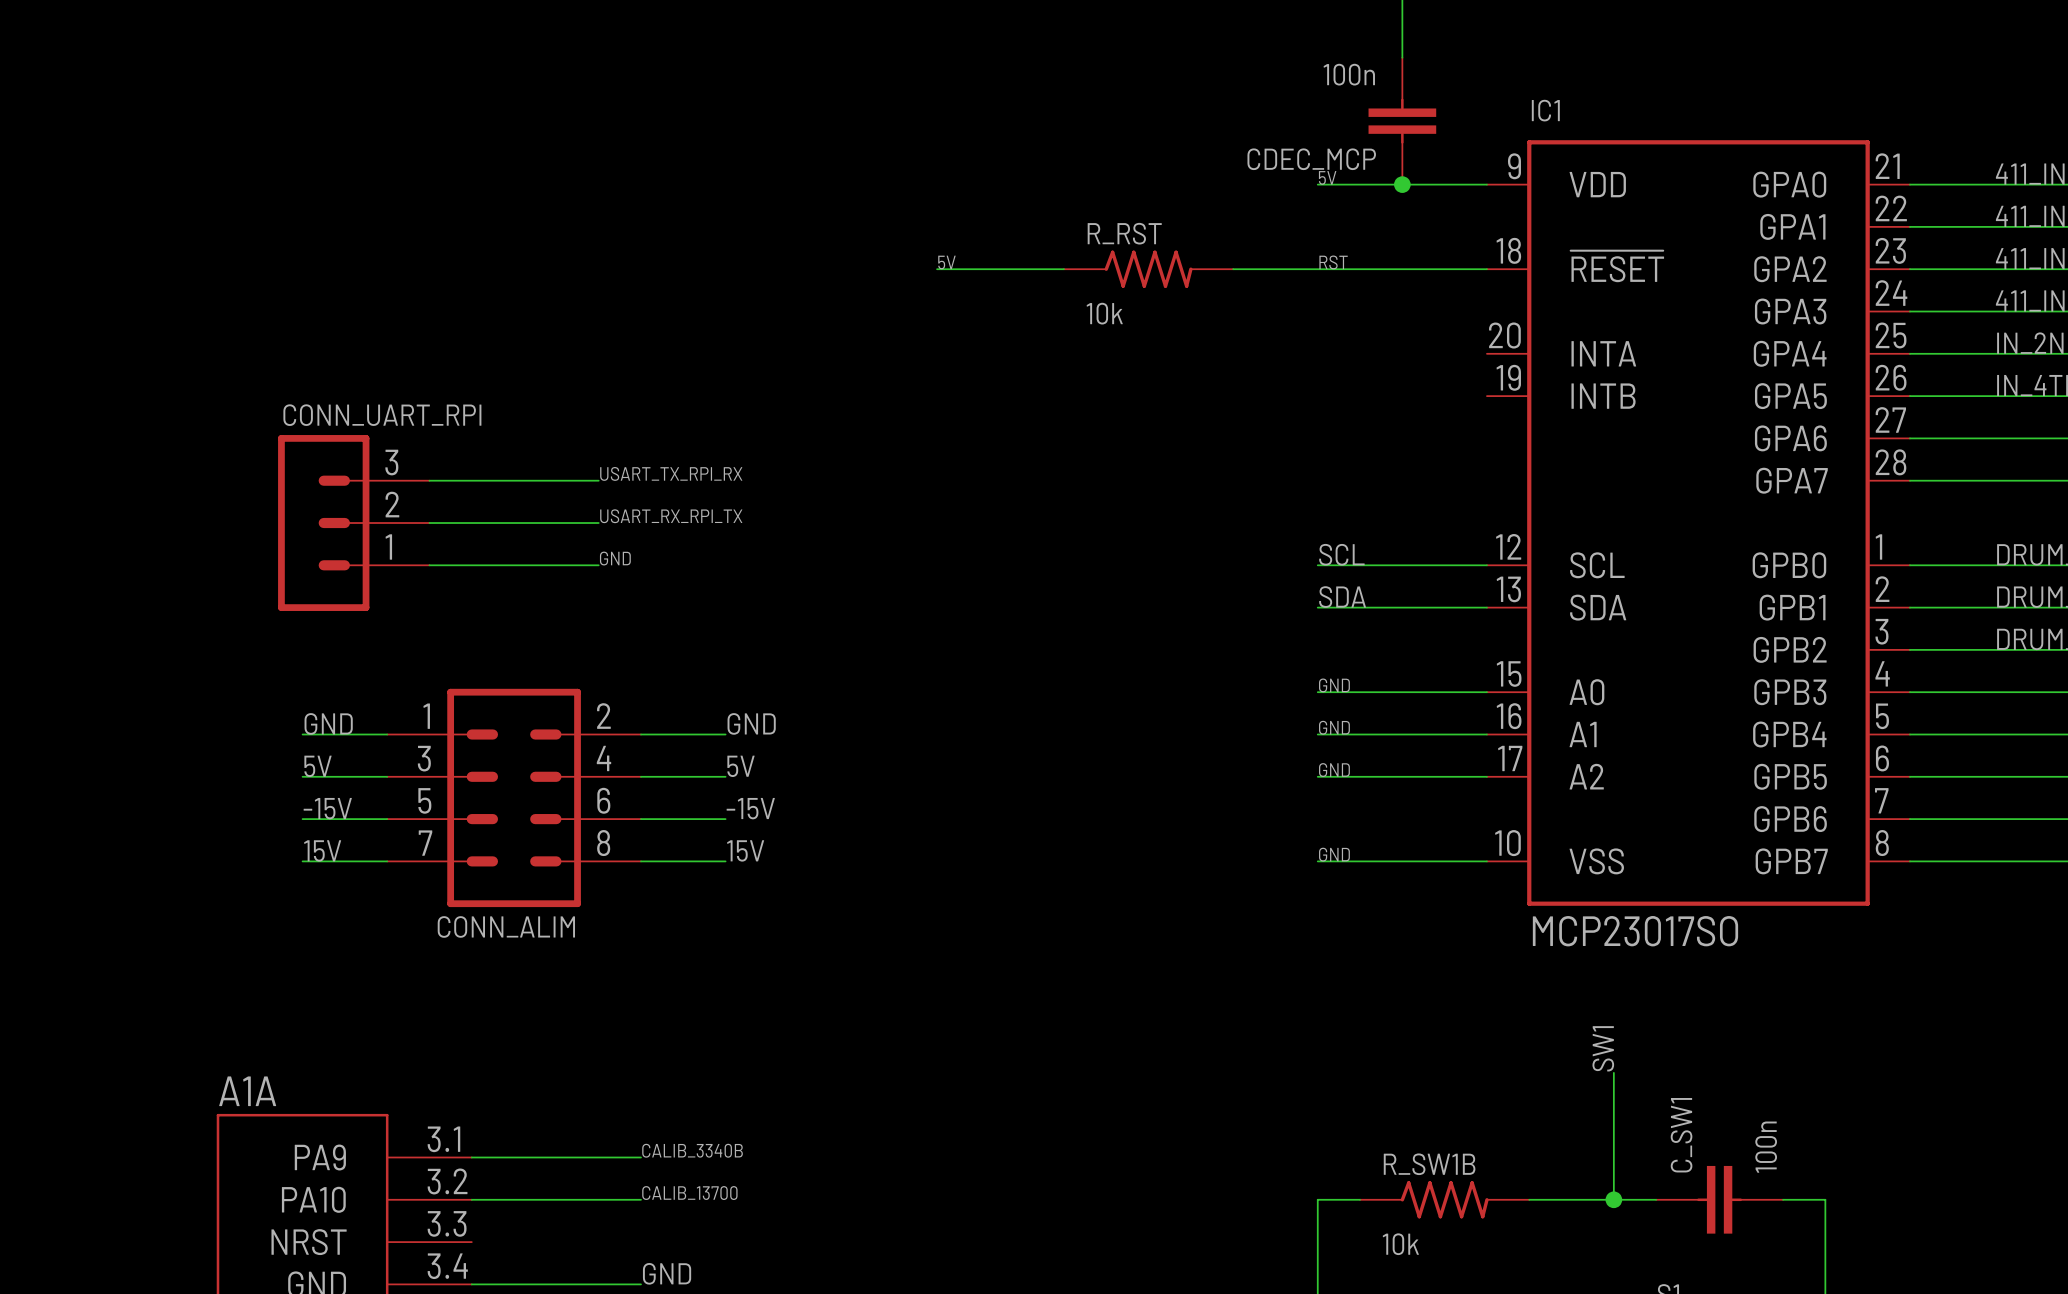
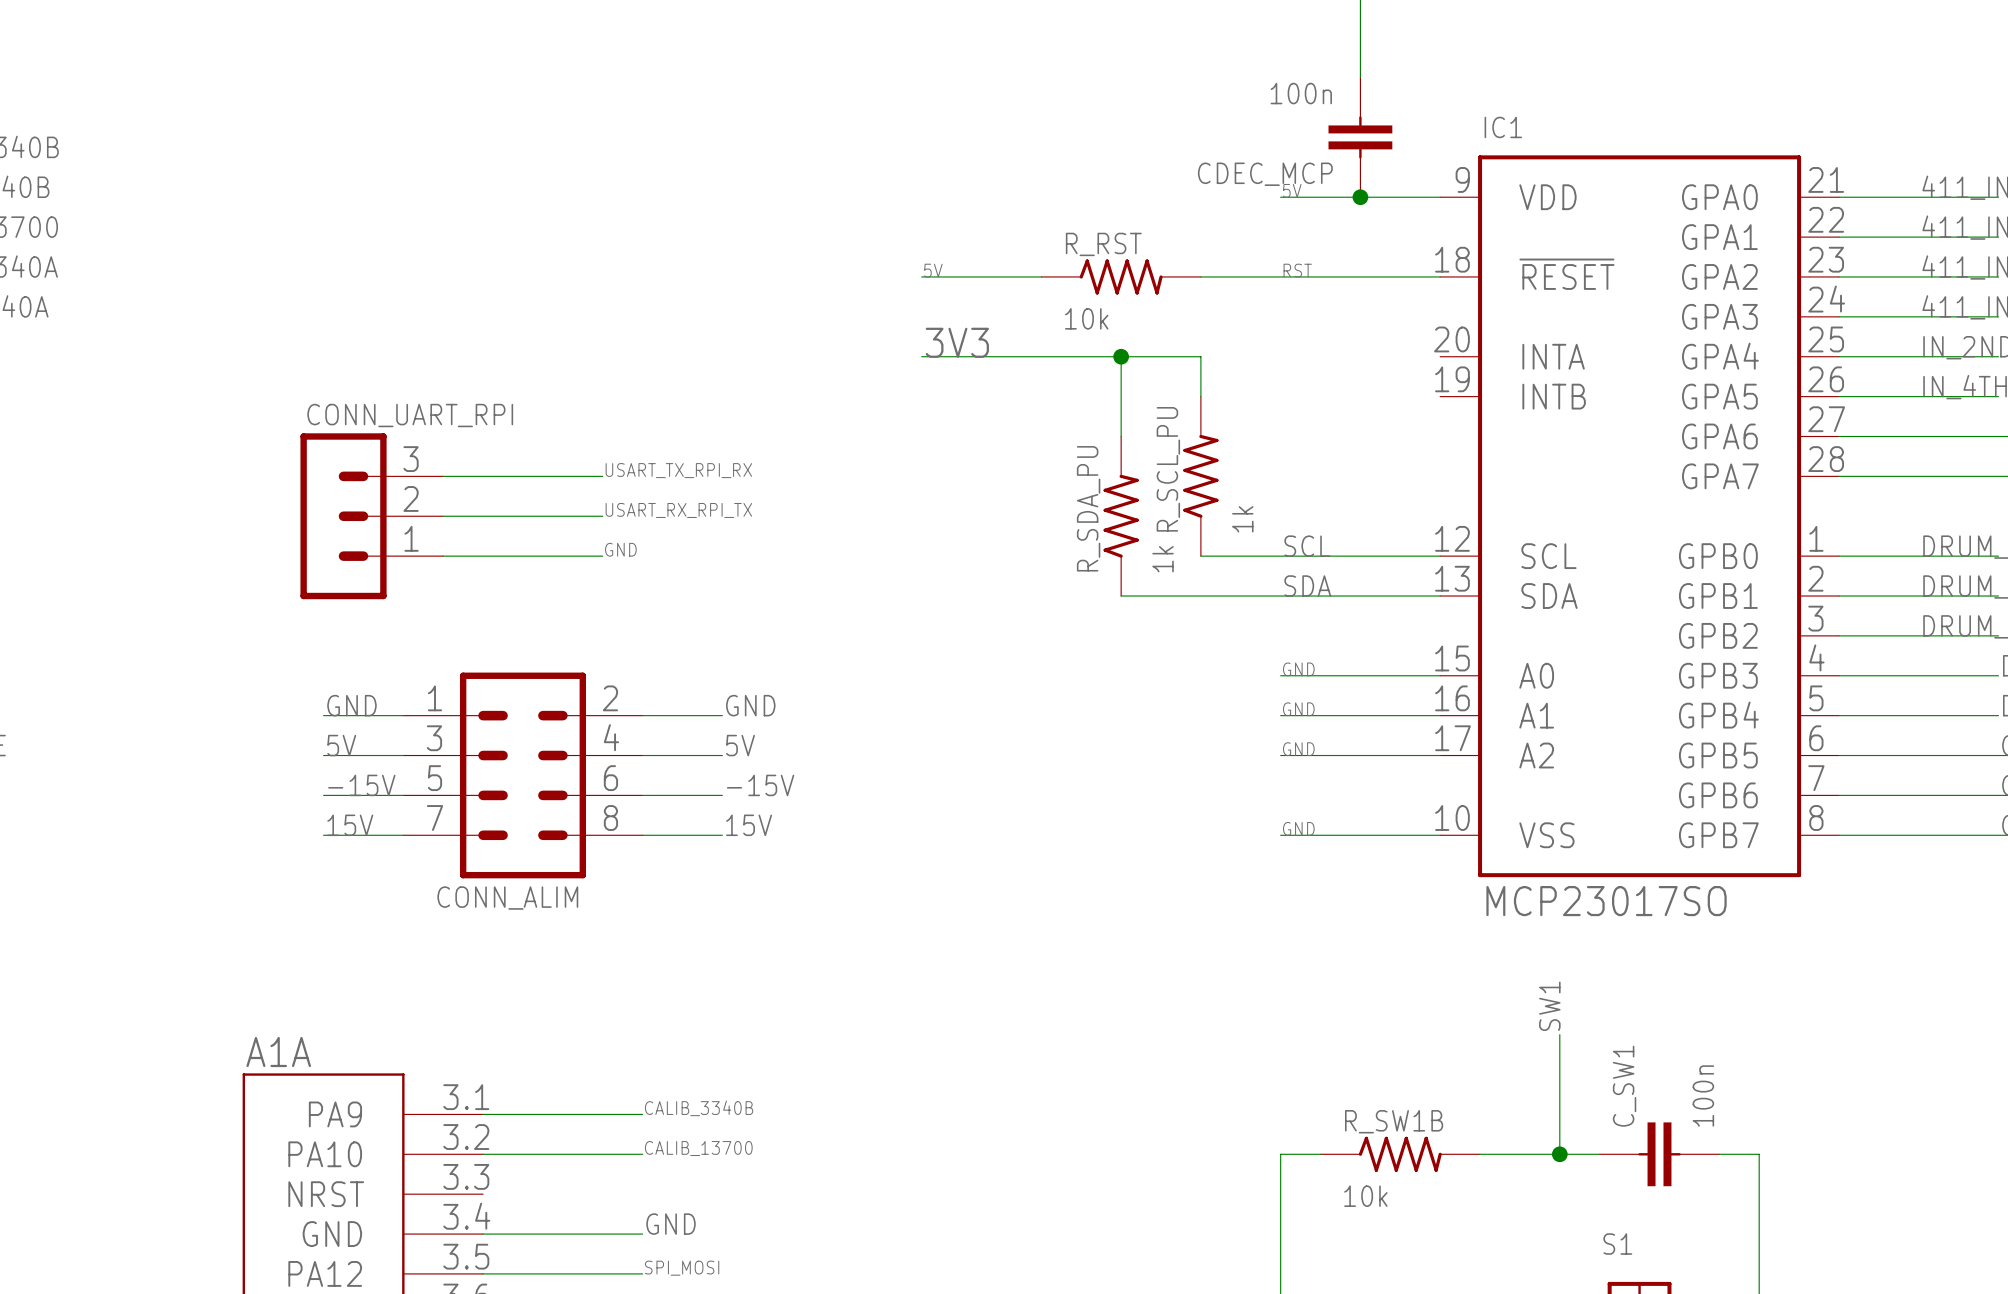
label: none -> 3V3 (957, 342)
wire: none -> (921, 356) (1200, 356) (1200, 396)
wire: none -> (1121, 356) (1121, 436)
junction: none -> (1121, 356)
R_SCL_PU: none -> 1k (1200, 476)
R_SDA_PU: none -> 1k (1121, 516)
wire: none -> (1200, 556) (1280, 556)
wire: none -> (1121, 596) (1280, 596)

